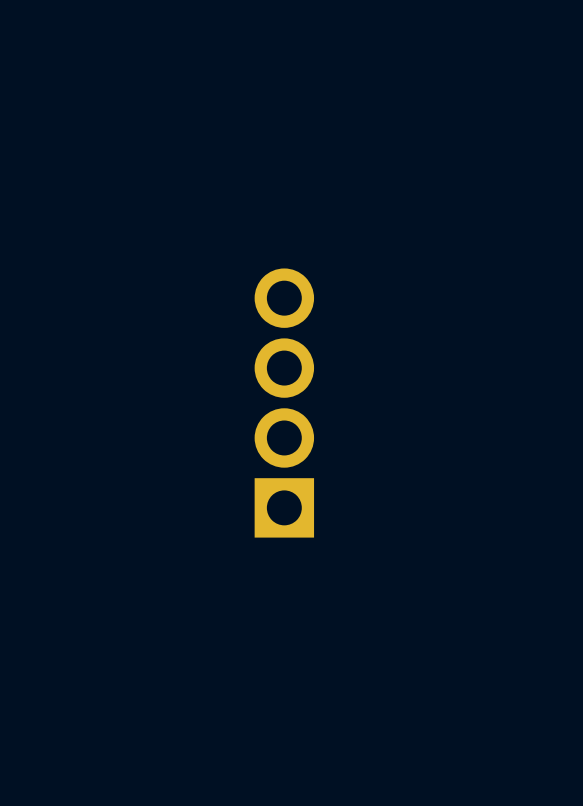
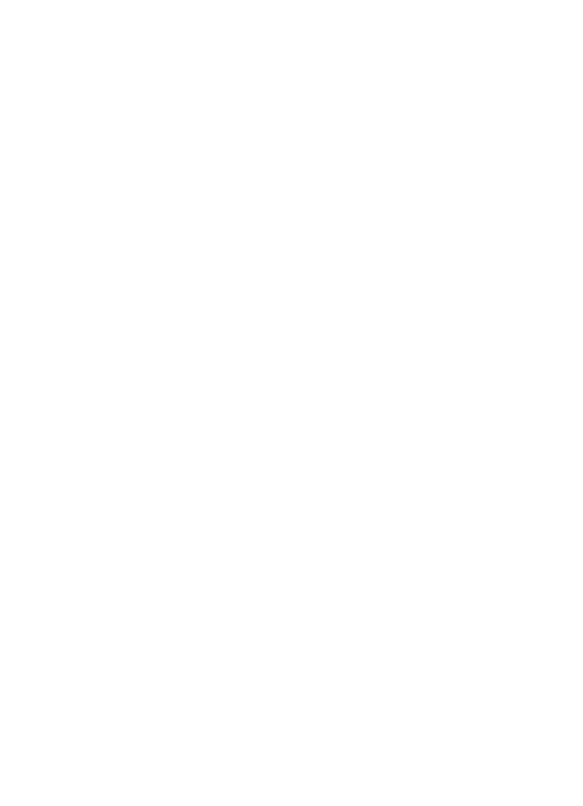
part: (284, 403) -> none

